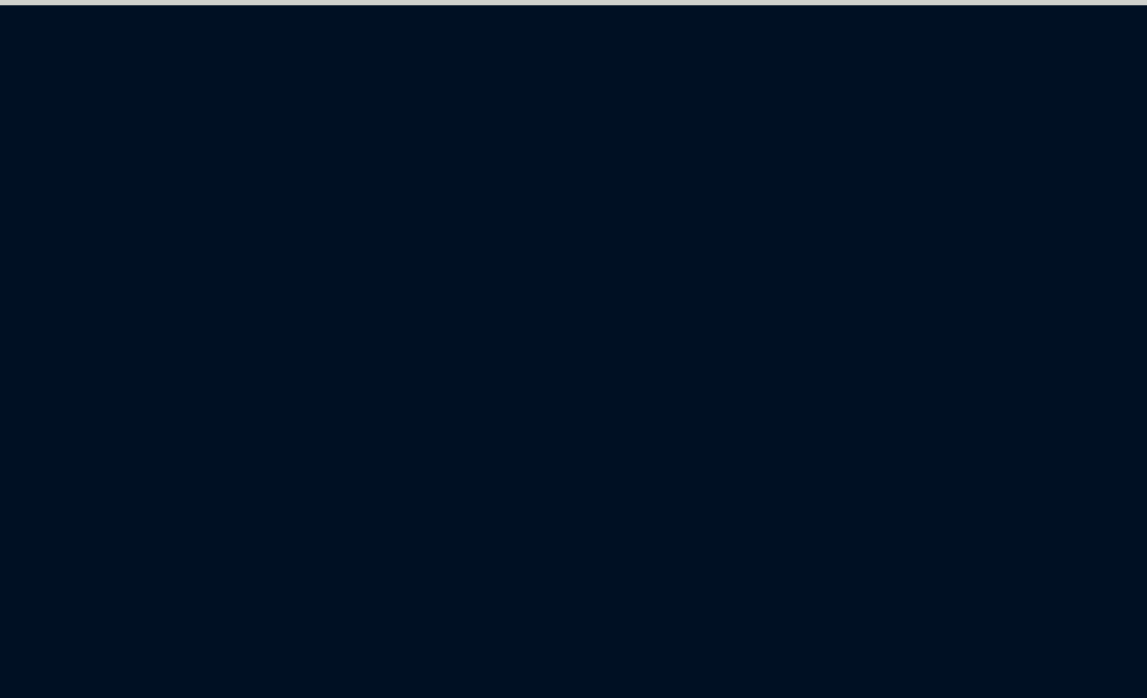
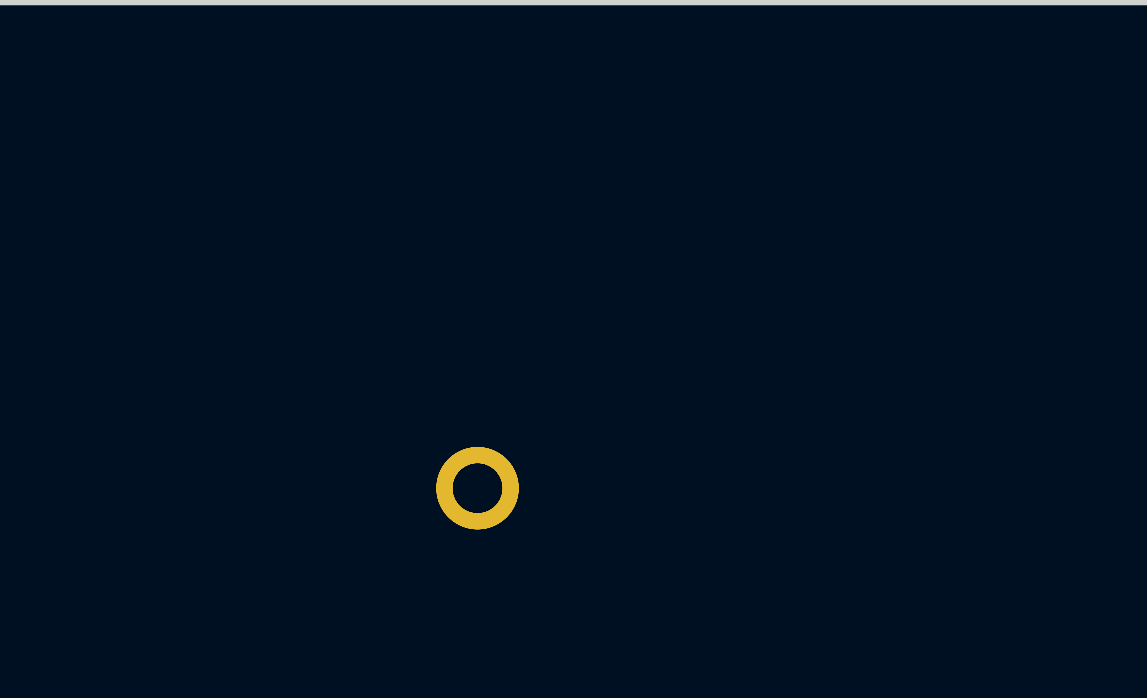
part: none -> (477, 488)

